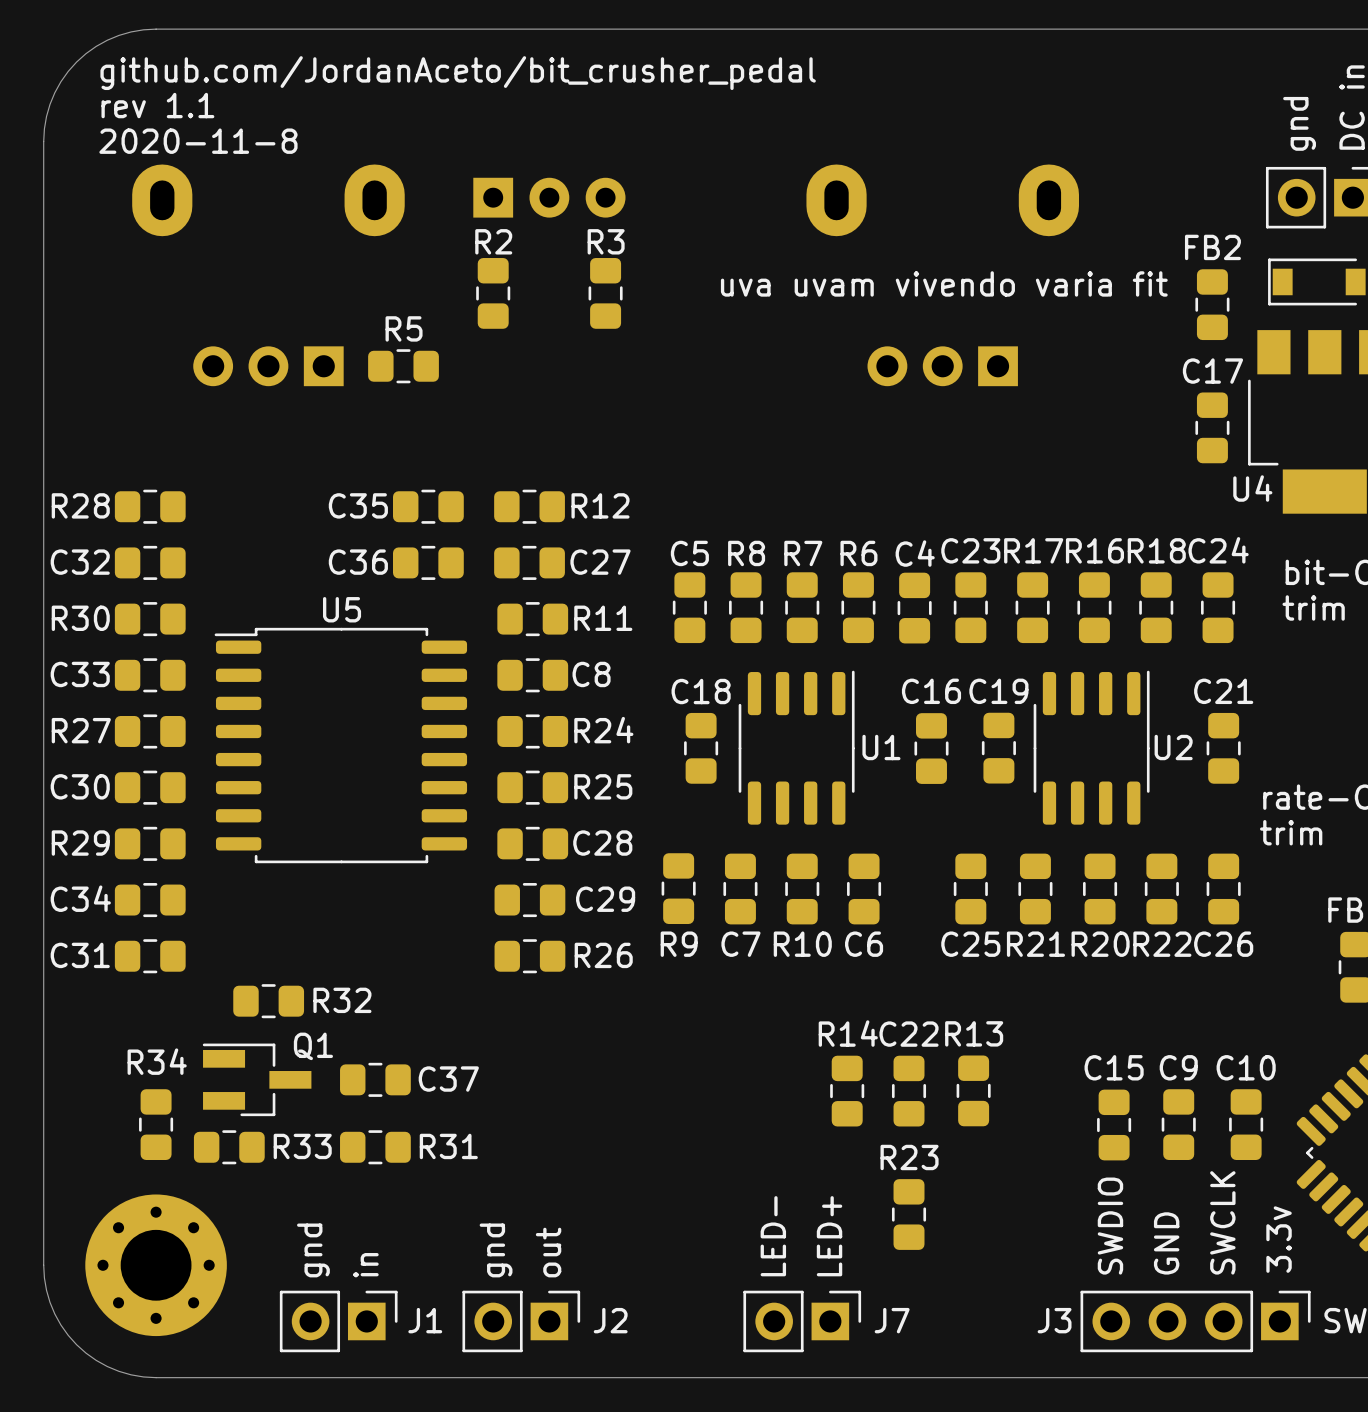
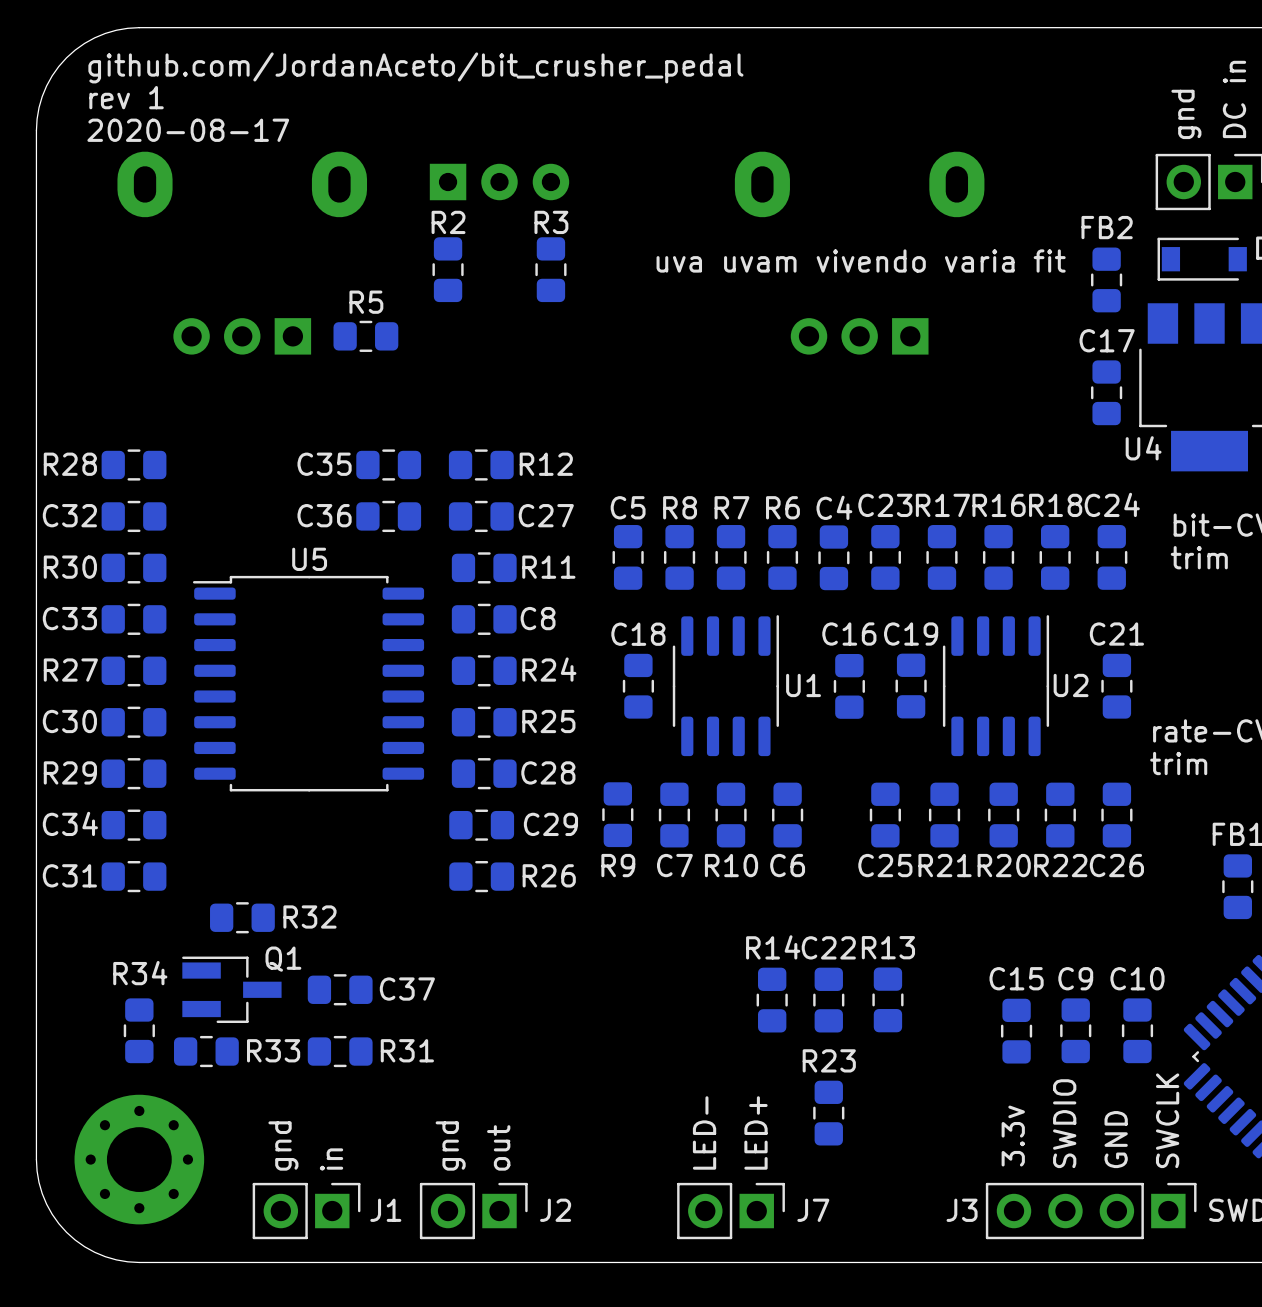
text: rev 1.1 (157, 105) -> rev 1 (126, 97)
text: 2020-11-8 (198, 141) -> 2020-08-17 (188, 130)
text: SWCLK (1222, 1222) -> GND (1116, 1139)
text: none -> SWCLK (1167, 1120)
text: SWDIO (1110, 1226) -> none
text position: 3.3v (1279, 1239) -> 3.3v (1013, 1136)
text: GND (1166, 1243) -> SWDIO (1064, 1123)

